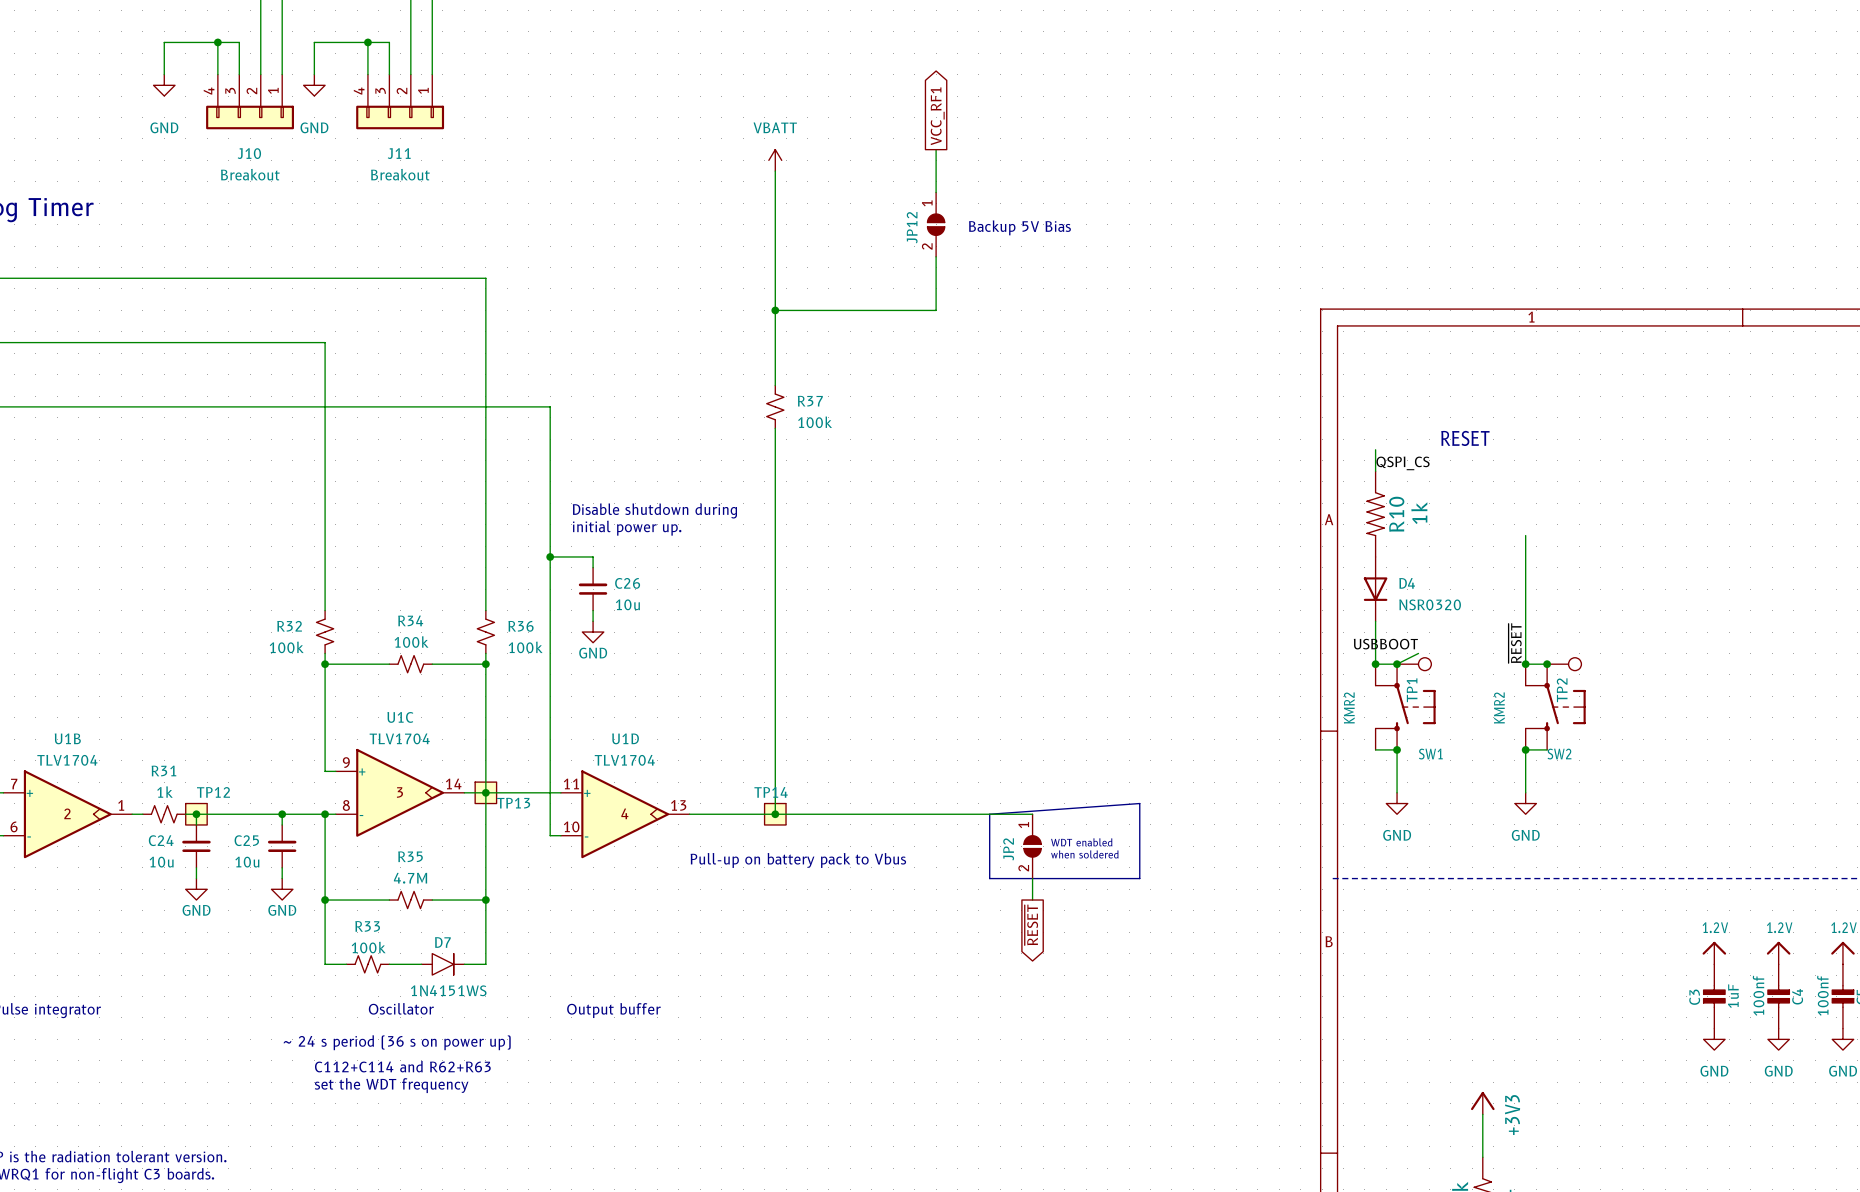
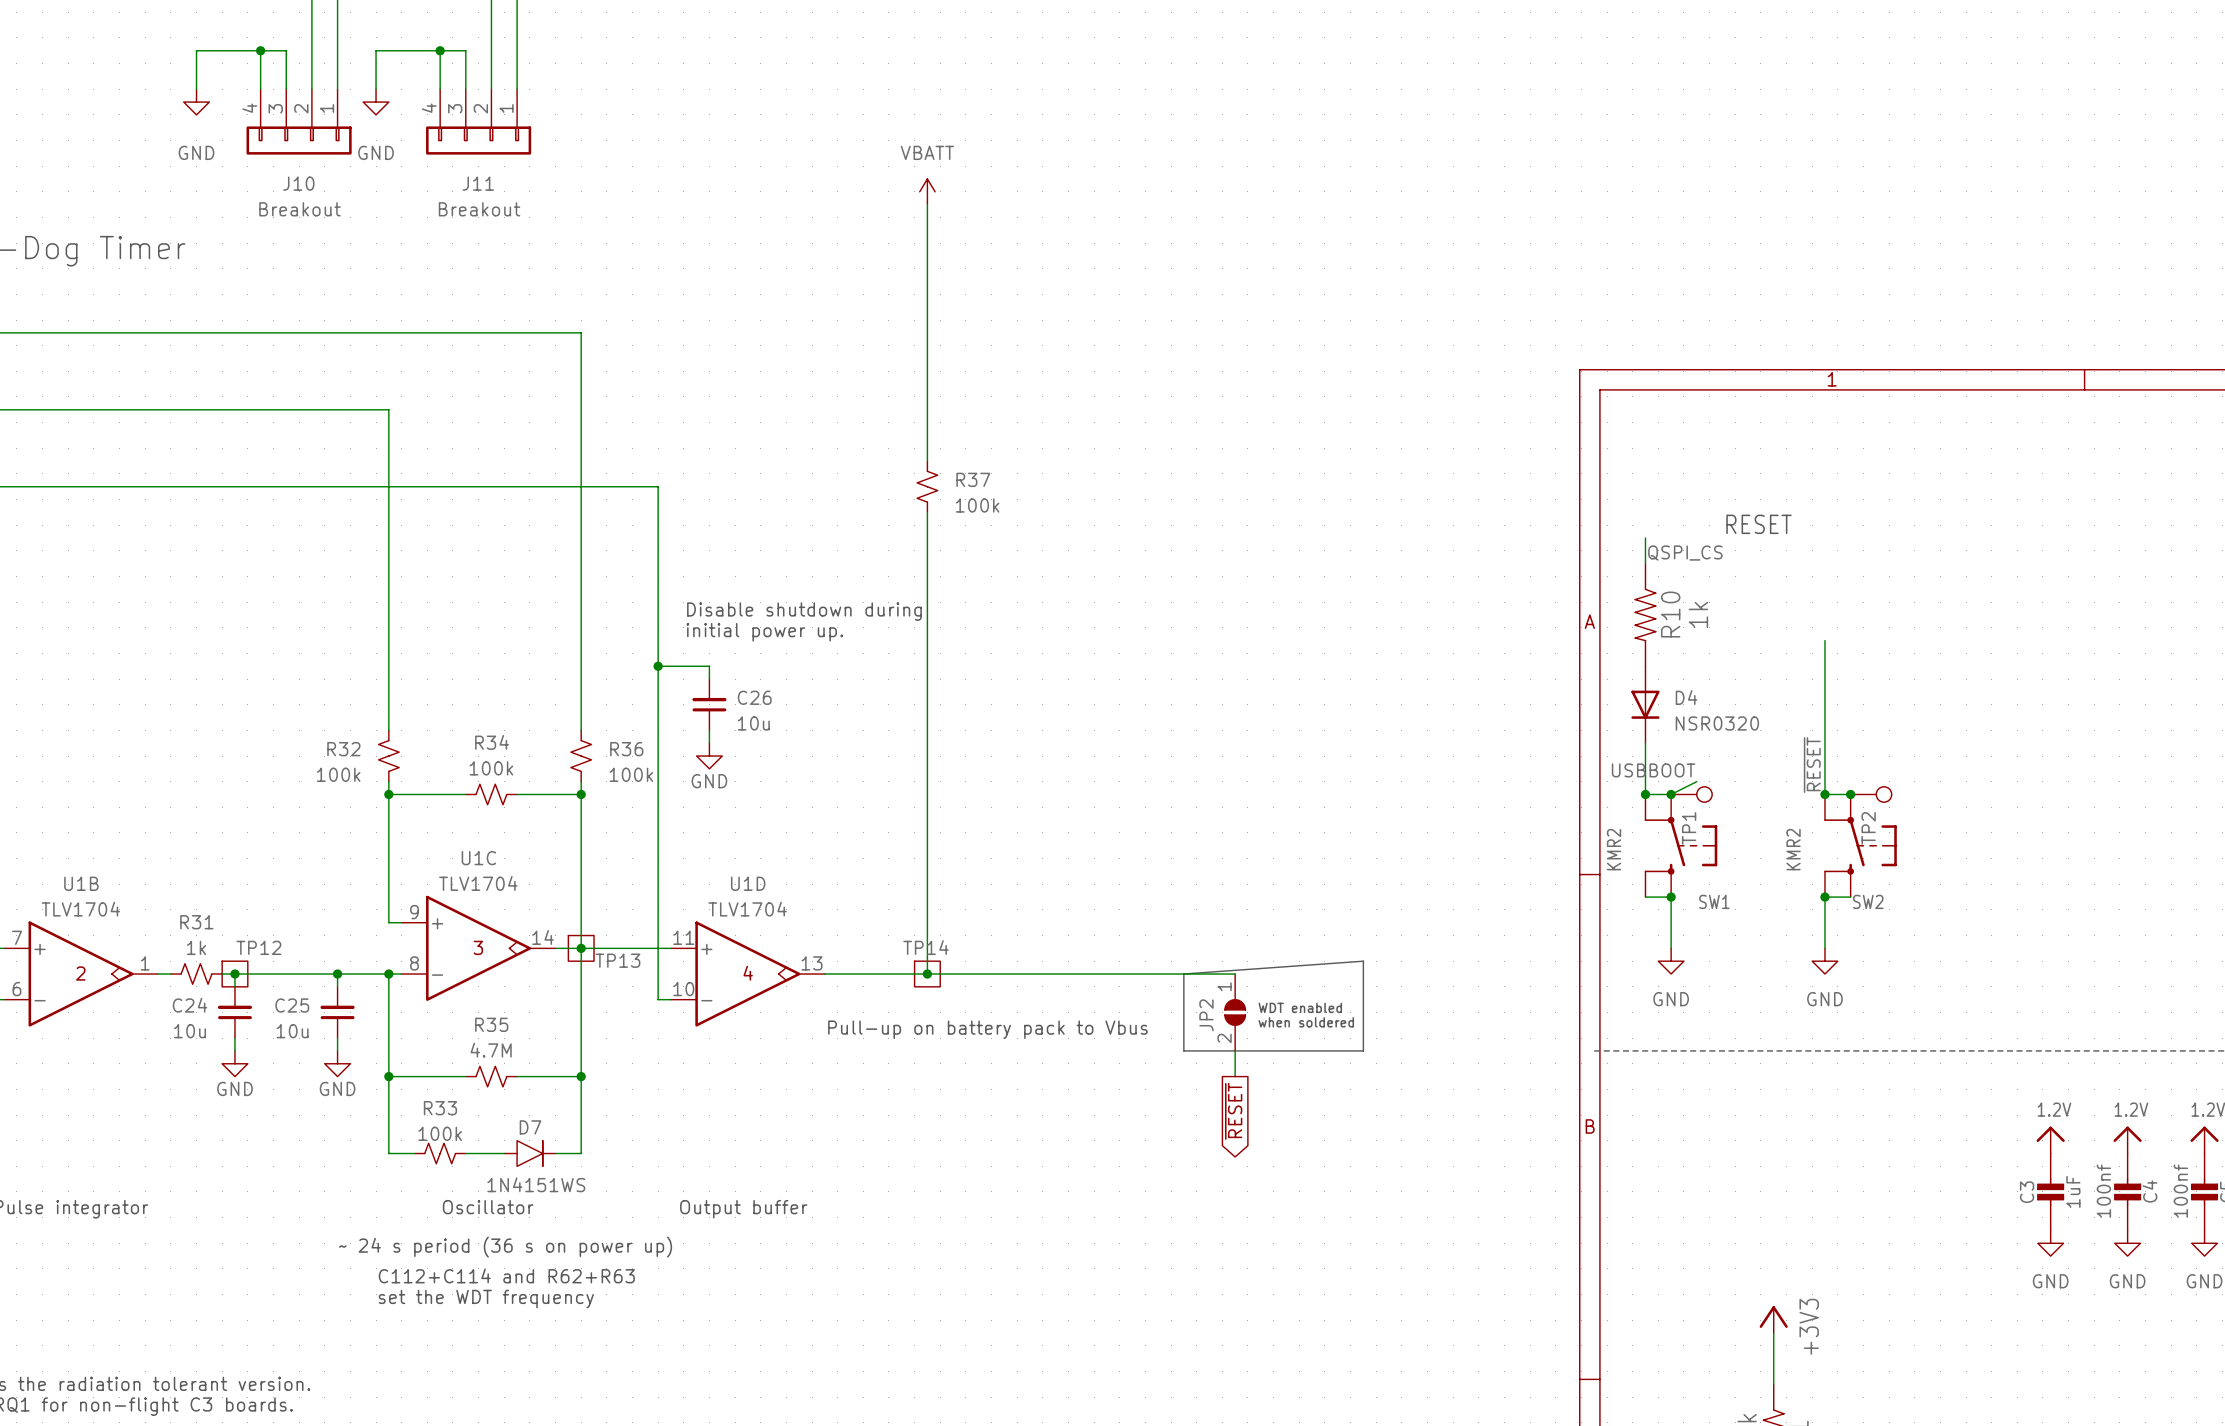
global label: VCC_RF1 (937, 116) -> none
wire: (936, 149) (936, 192) -> none
JP12: (936, 224) -> none
text: Backup 5V Bias (1019, 227) -> none
wire: (936, 256) (936, 310) (775, 310) -> none
junction: (775, 310) -> none

